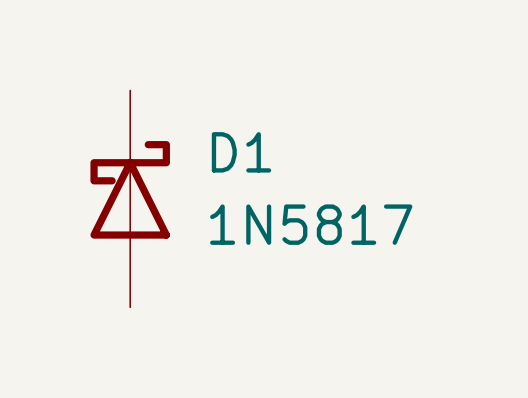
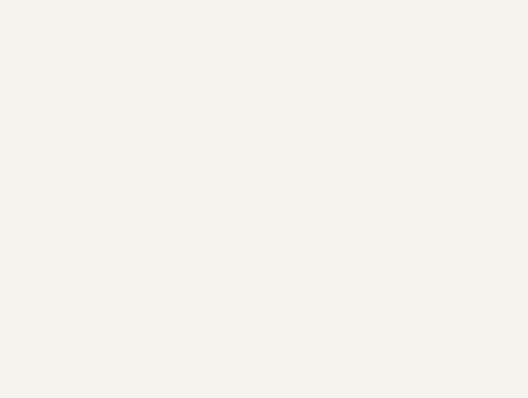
D1: 1N5817 (130, 198) -> none

